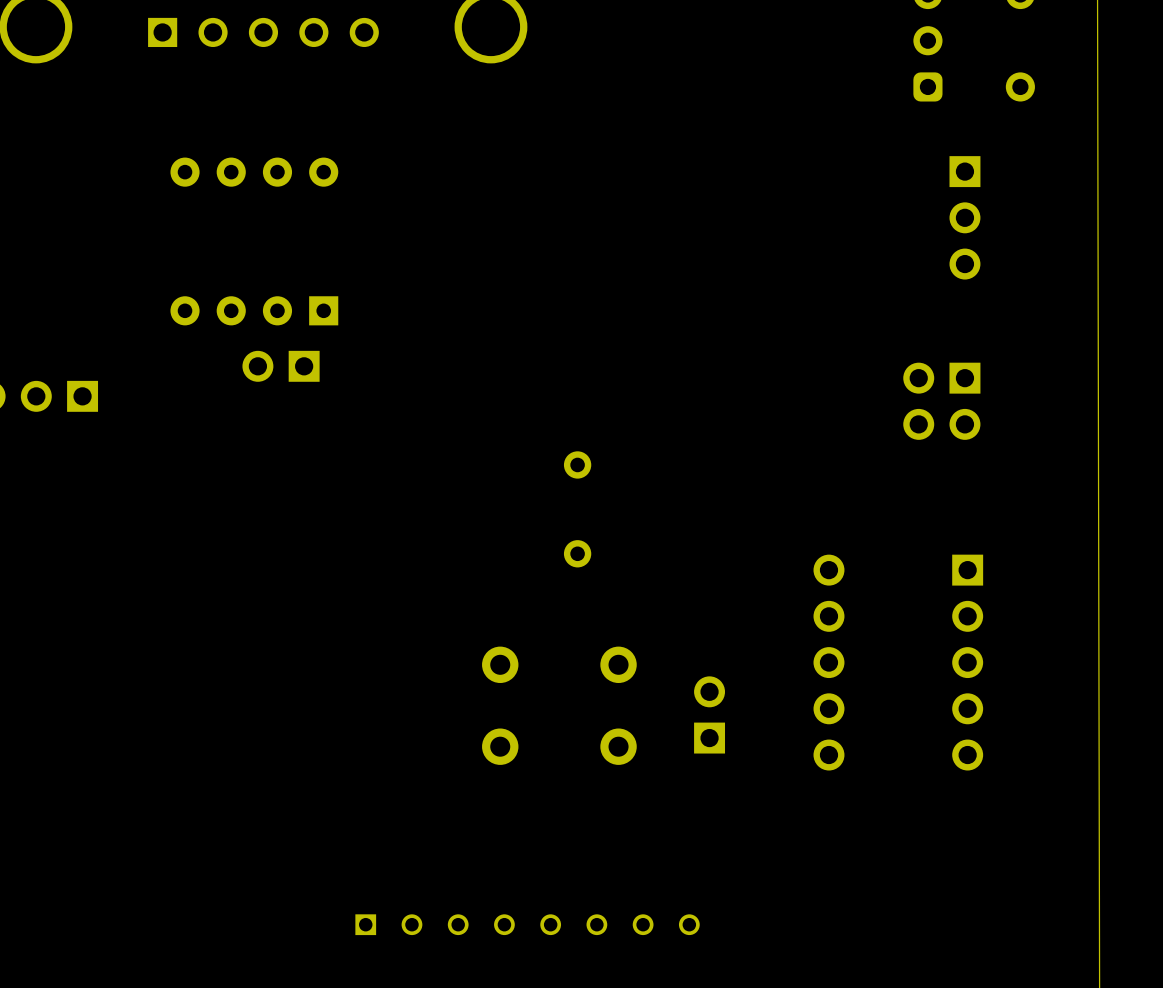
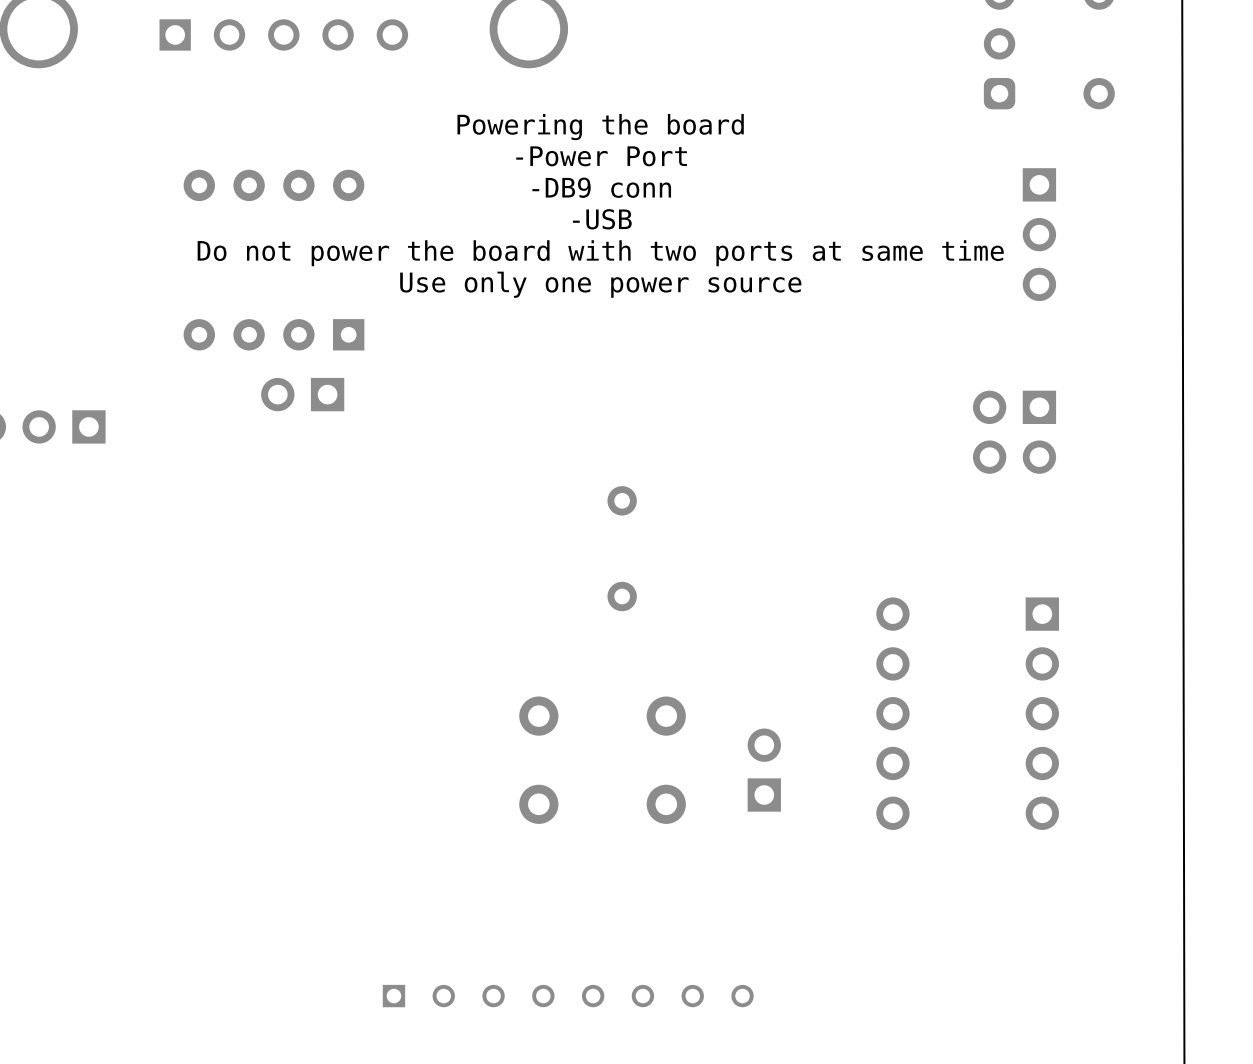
text: none -> Powering the board (600, 127)
text: none -> -Power Port (601, 156)
text: none -> -DB9 conn (601, 187)
text: none -> -USB (602, 219)
text: none -> Do not power the board with two ports at same time (600, 253)
text: none -> Use only one power source (600, 284)

